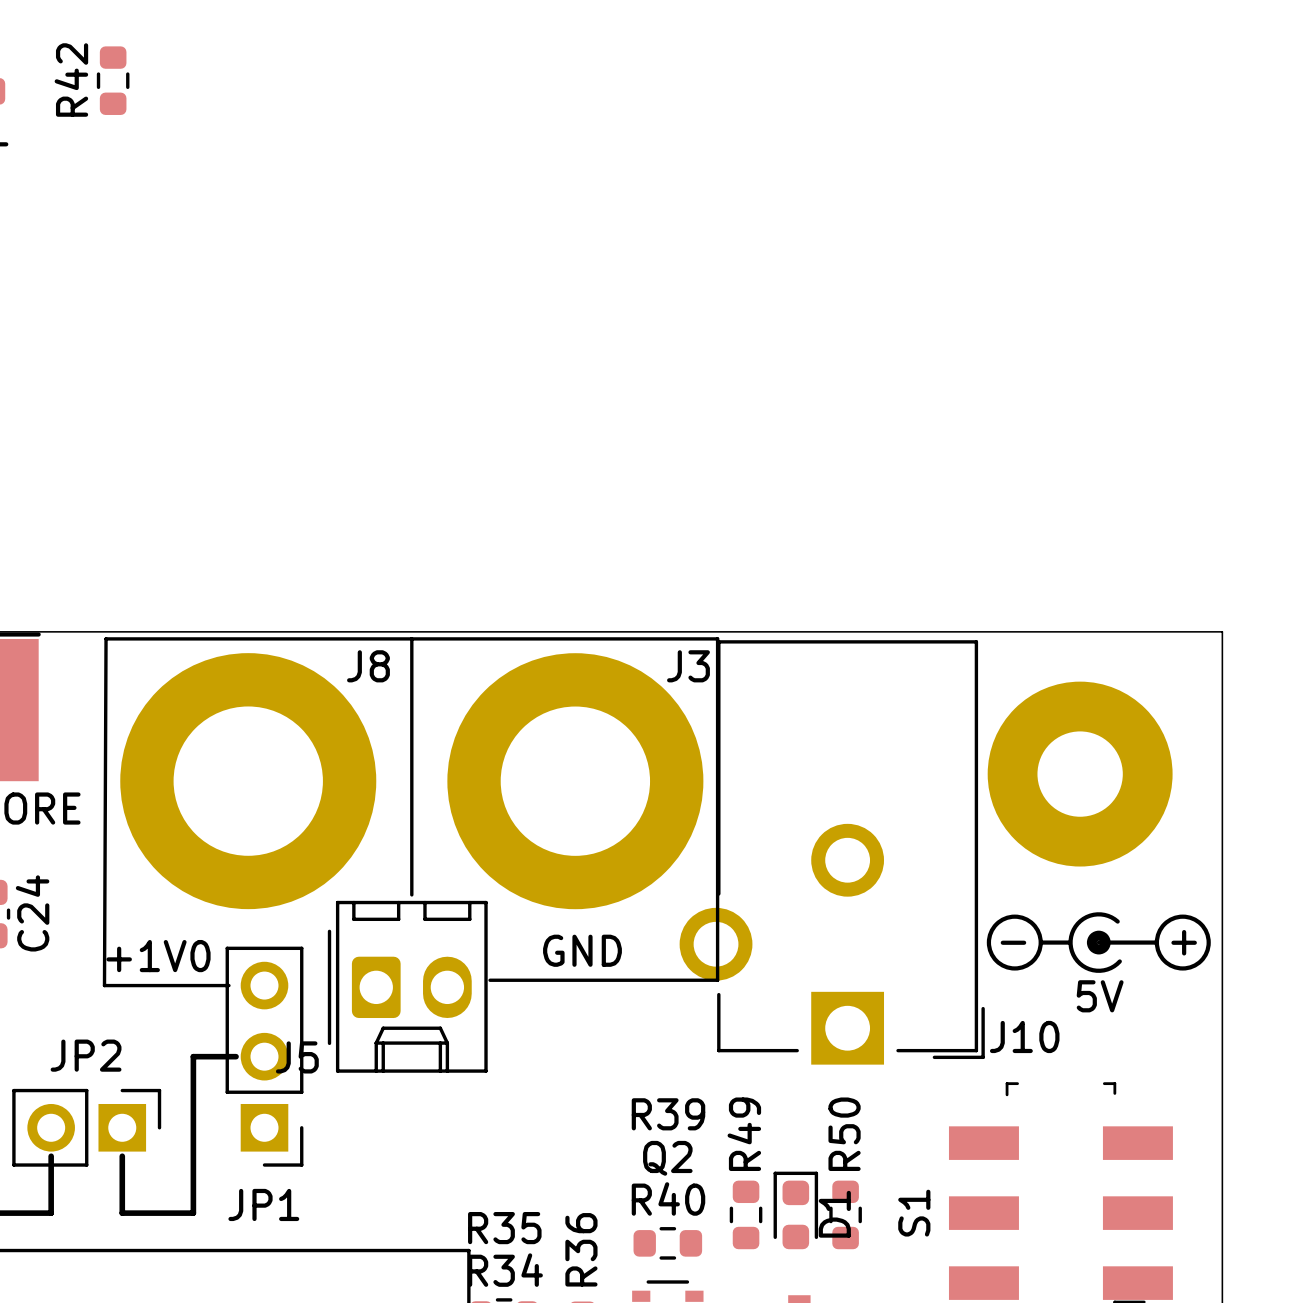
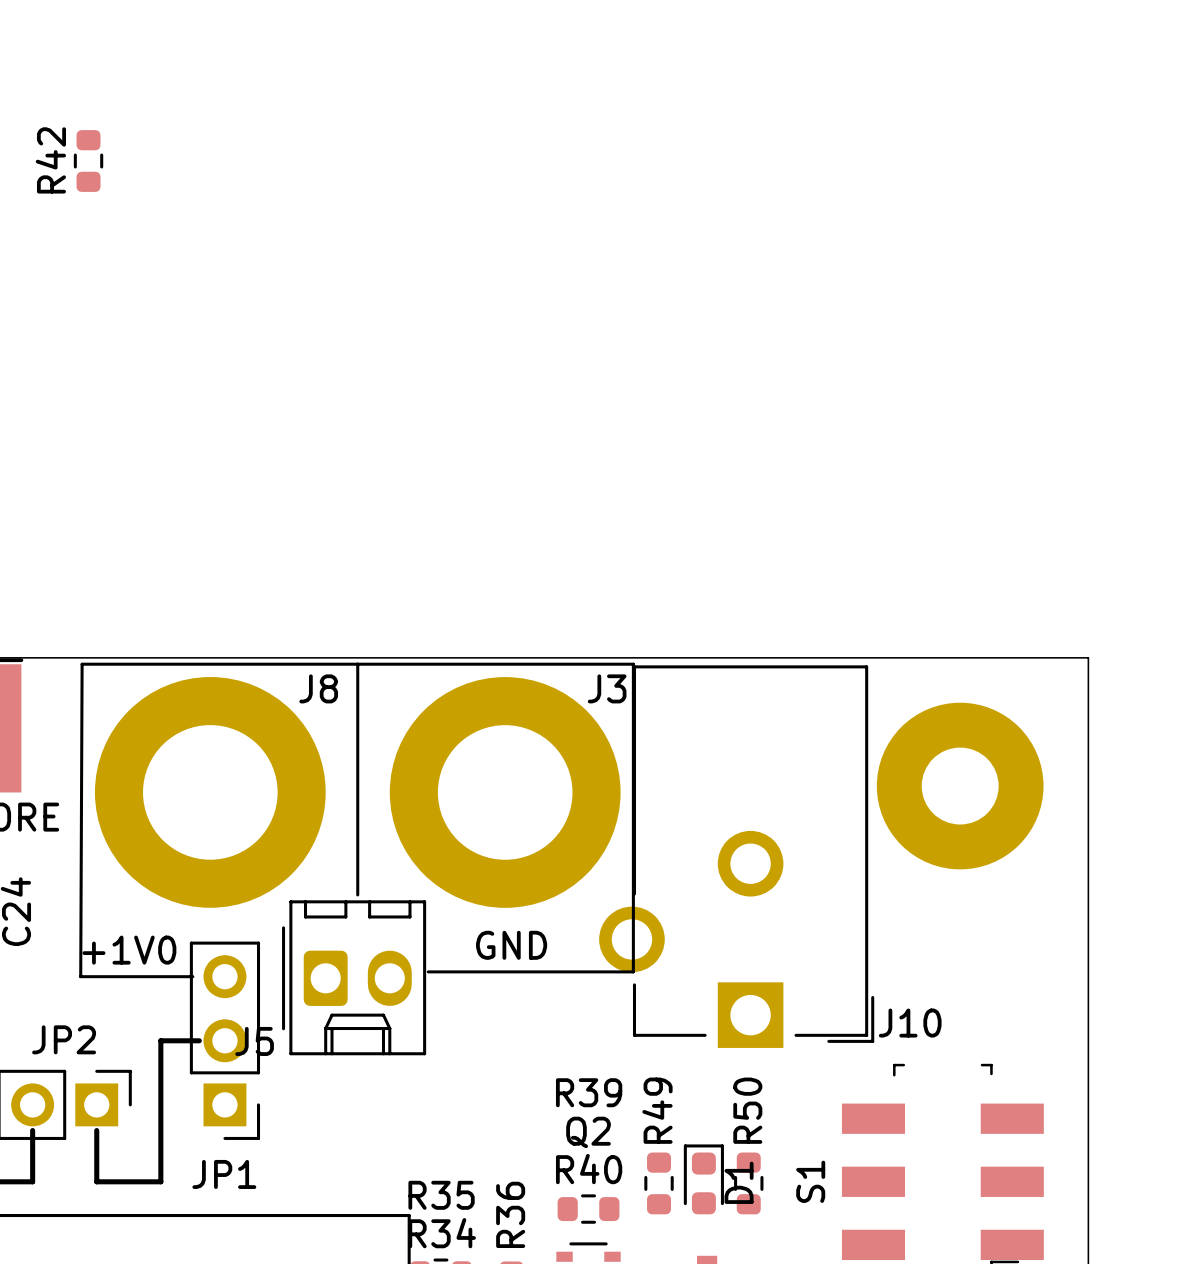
drawing: [986, 912, 1211, 973] -> none
text: - (1013, 942) -> none
text: + (1184, 942) -> none
text: 5V (1100, 996) -> none

